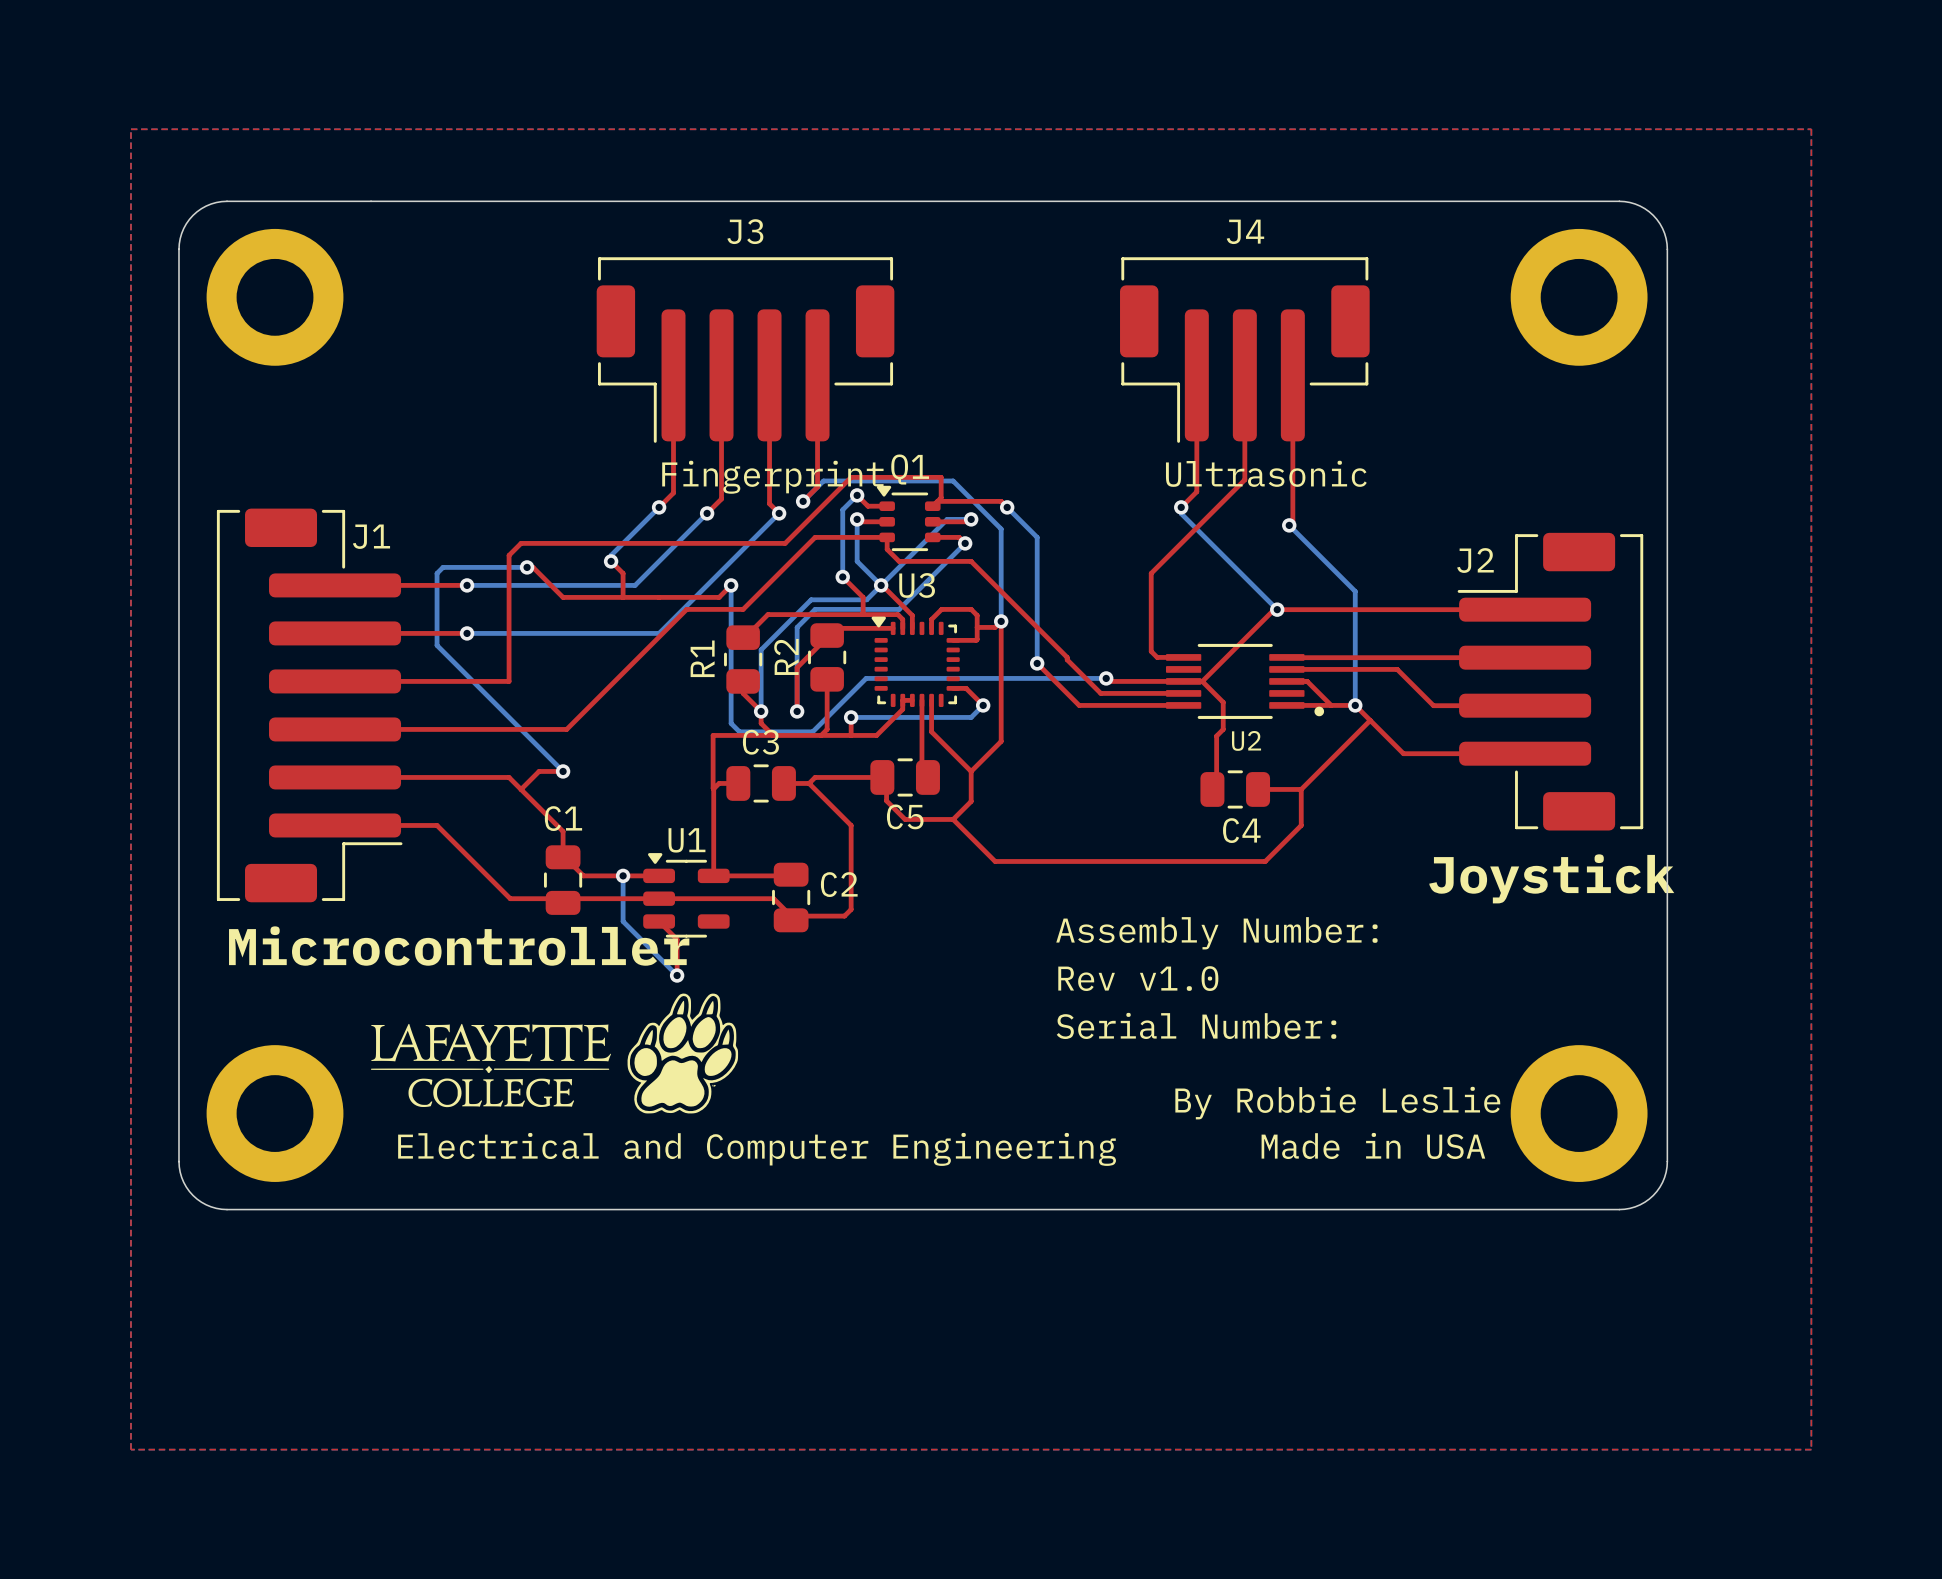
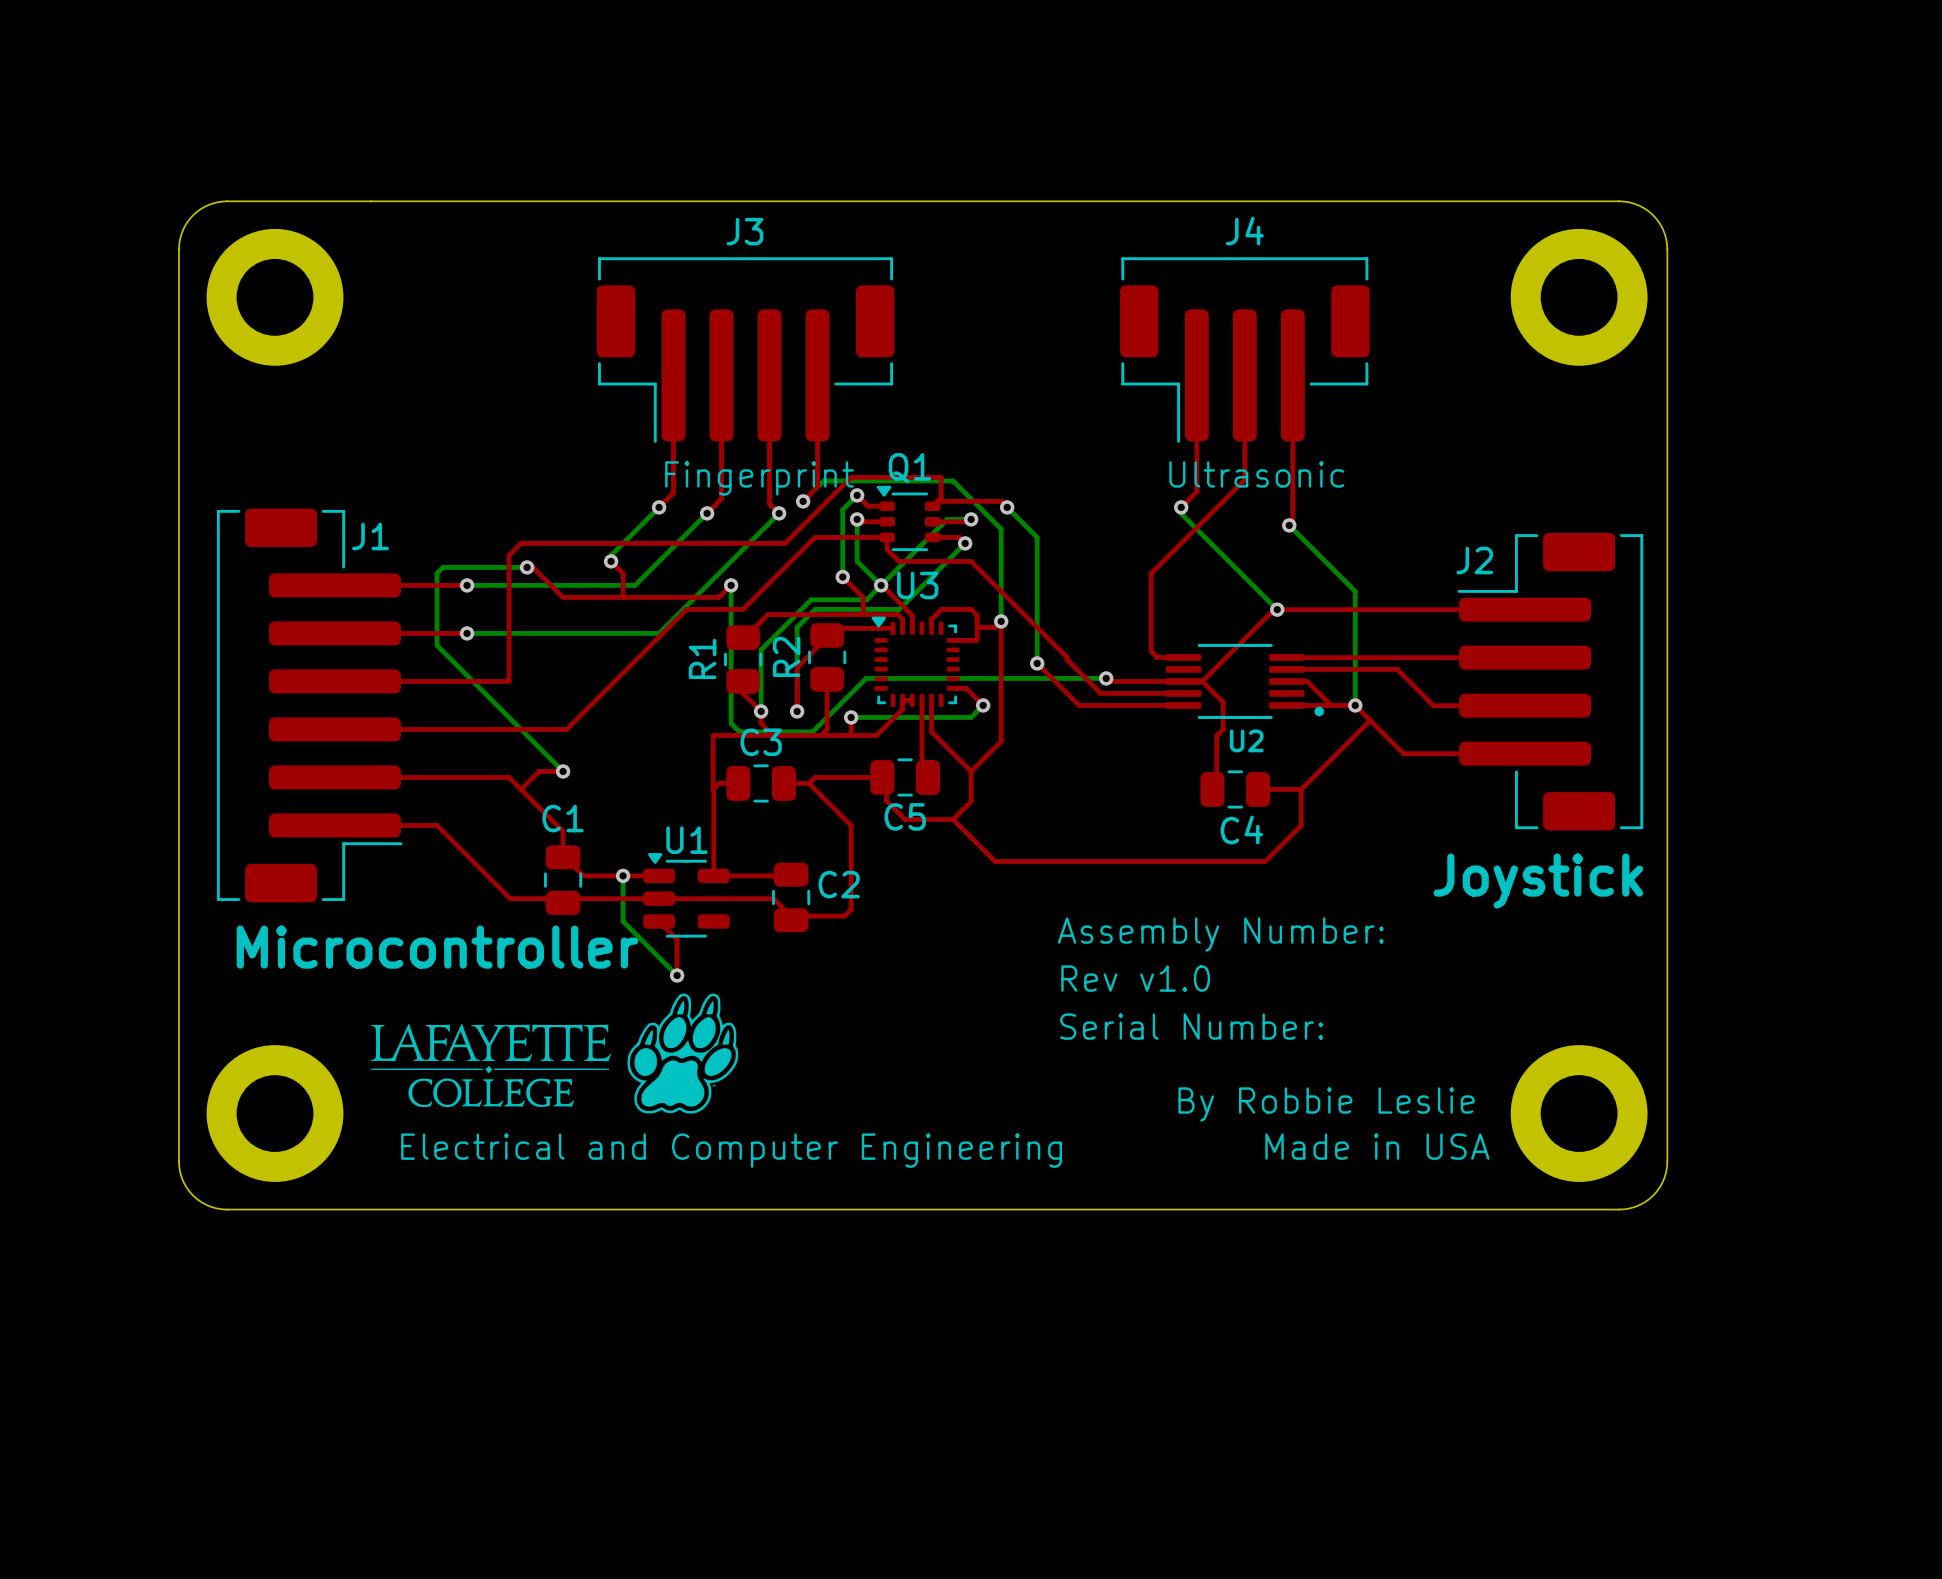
top zone outline: (130, 129) (1811, 129) (1811, 1449) (130, 1449) (130, 129) -> none

